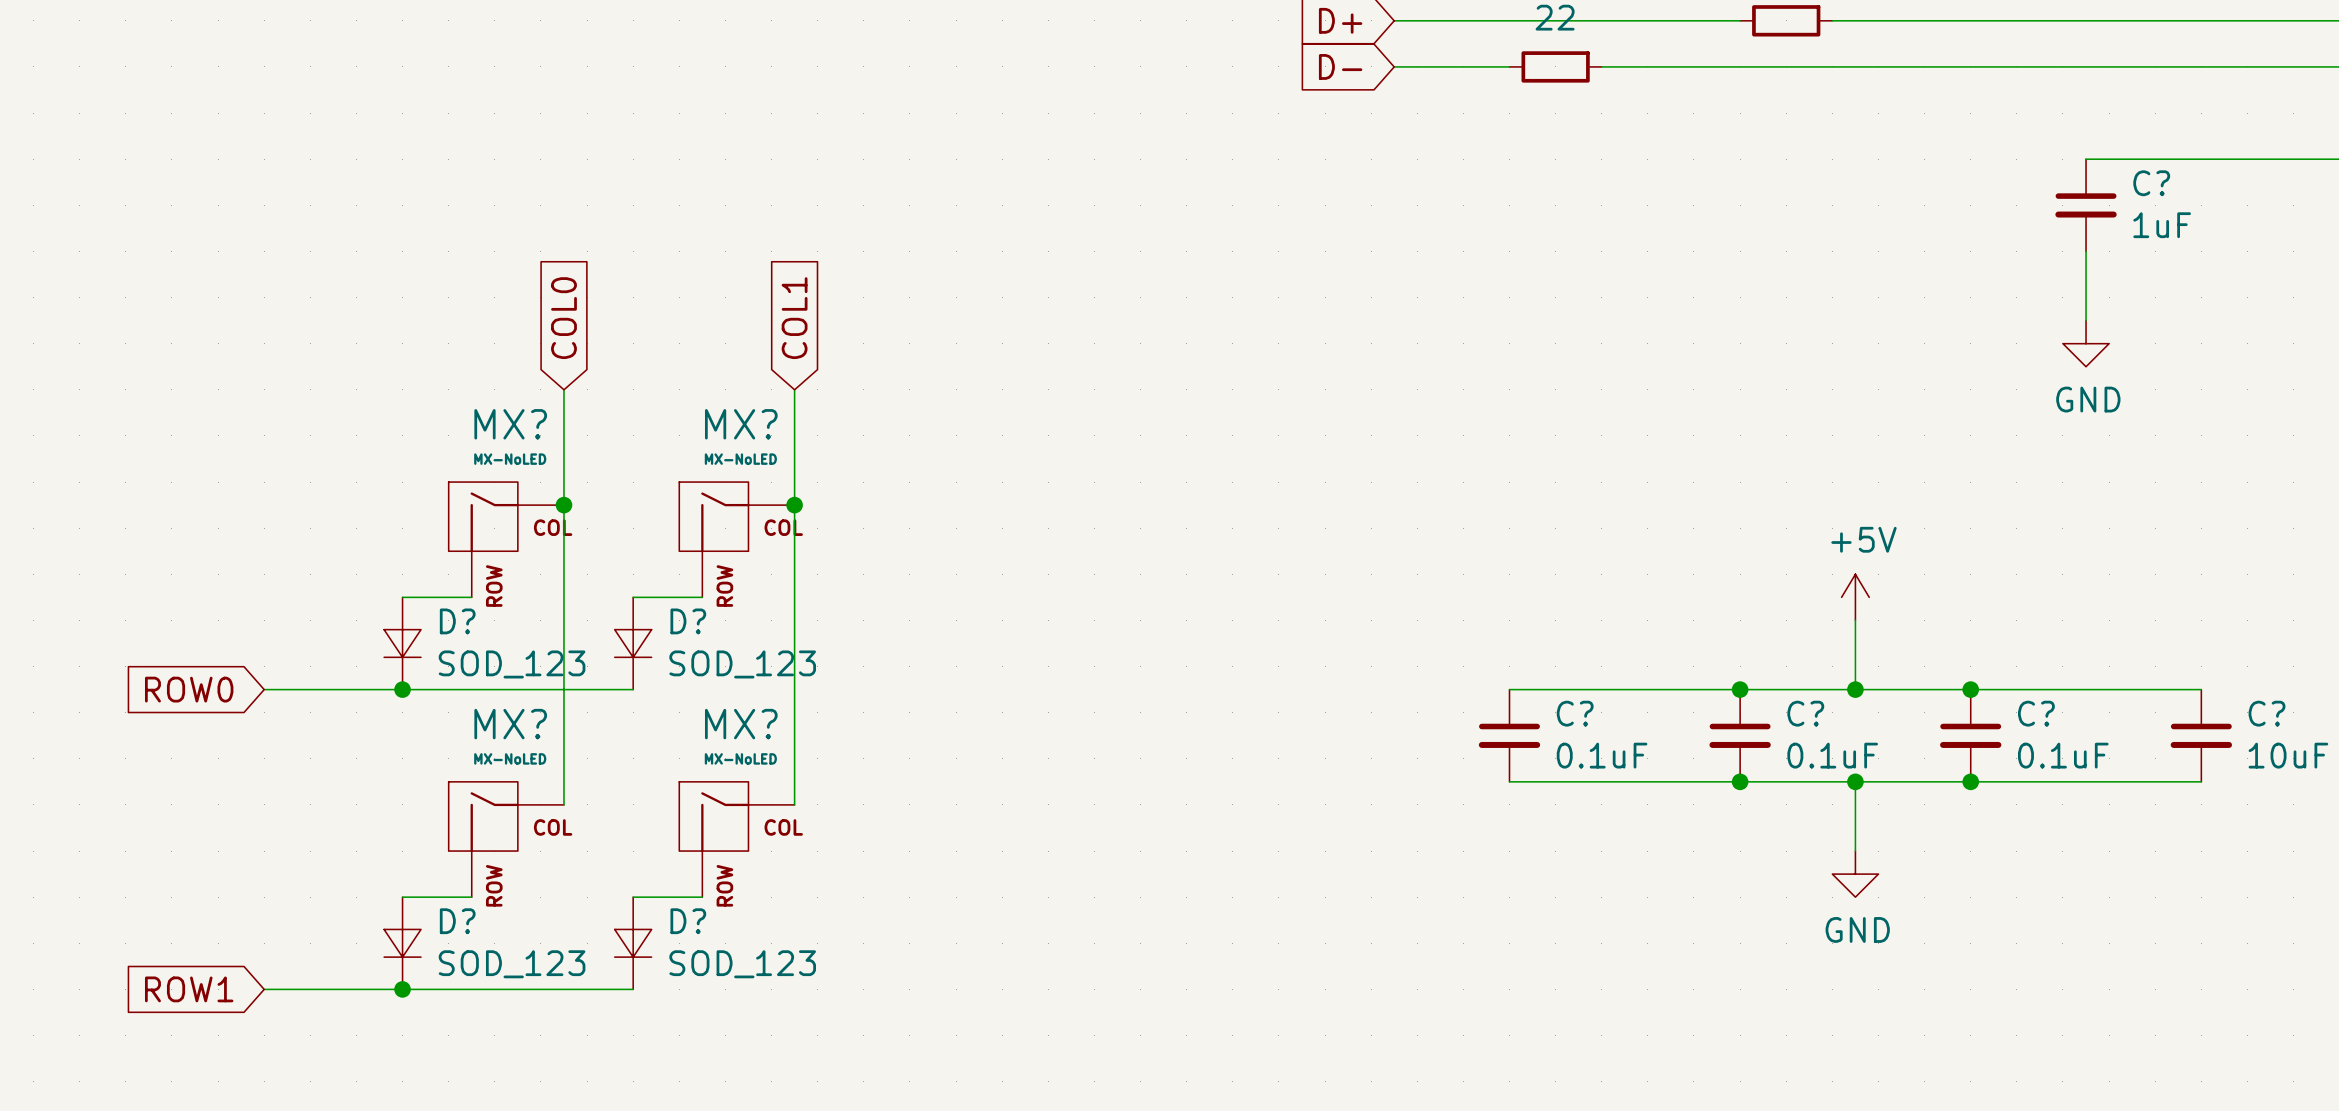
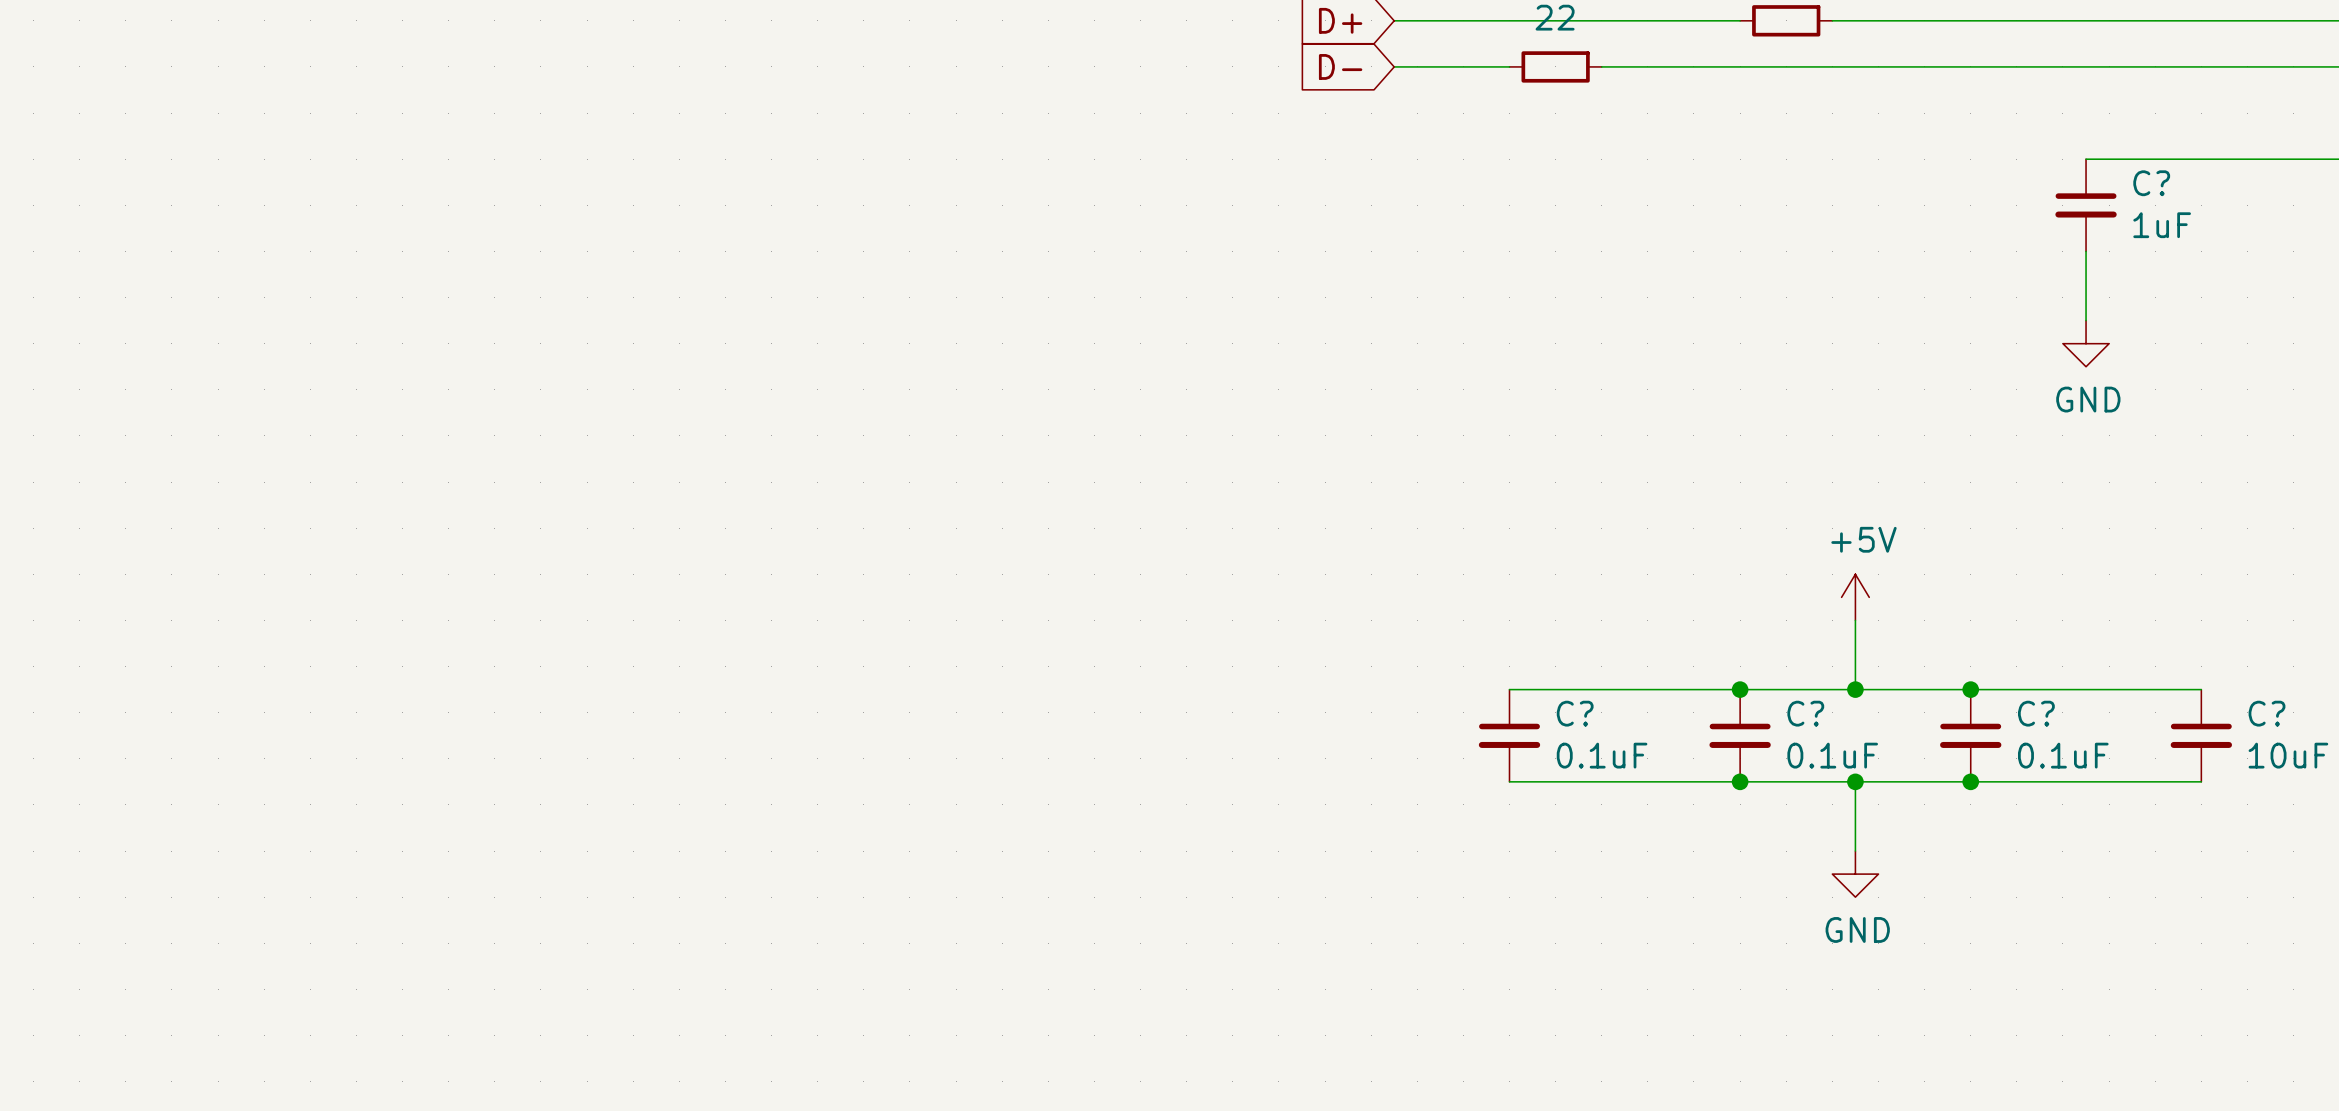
global label: COL0 (563, 318) -> none
global label: COL1 (794, 318) -> none
wire: (563, 389) (563, 804) -> none
wire: (794, 389) (794, 804) -> none
junction: (563, 505) -> none
junction: (794, 505) -> none
MX?: MX-NoLED (506, 539) -> none
MX?: MX-NoLED (736, 539) -> none
wire: (402, 597) (471, 597) -> none
wire: (633, 597) (702, 597) -> none
D?: SOD_123 (402, 643) -> none
D?: SOD_123 (633, 643) -> none
global label: ROW0 (189, 689) -> none
wire: (264, 689) (633, 689) -> none
junction: (402, 689) -> none
MX?: MX-NoLED (506, 839) -> none
MX?: MX-NoLED (736, 839) -> none
wire: (402, 897) (471, 897) -> none
wire: (633, 897) (702, 897) -> none
D?: SOD_123 (402, 943) -> none
D?: SOD_123 (633, 943) -> none
global label: ROW1 (189, 989) -> none
wire: (264, 989) (633, 989) -> none
junction: (402, 989) -> none

